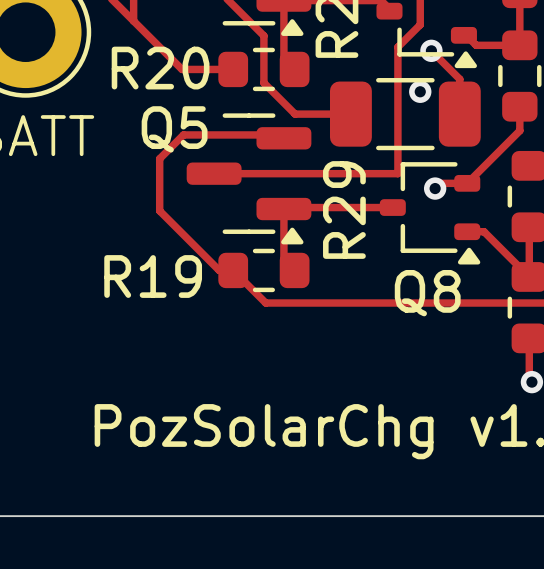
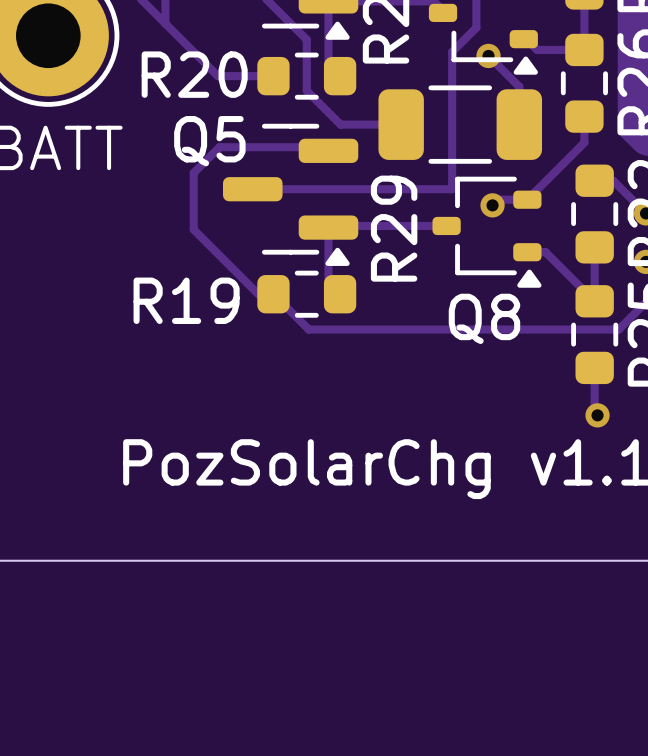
via: (420, 91) -> none

